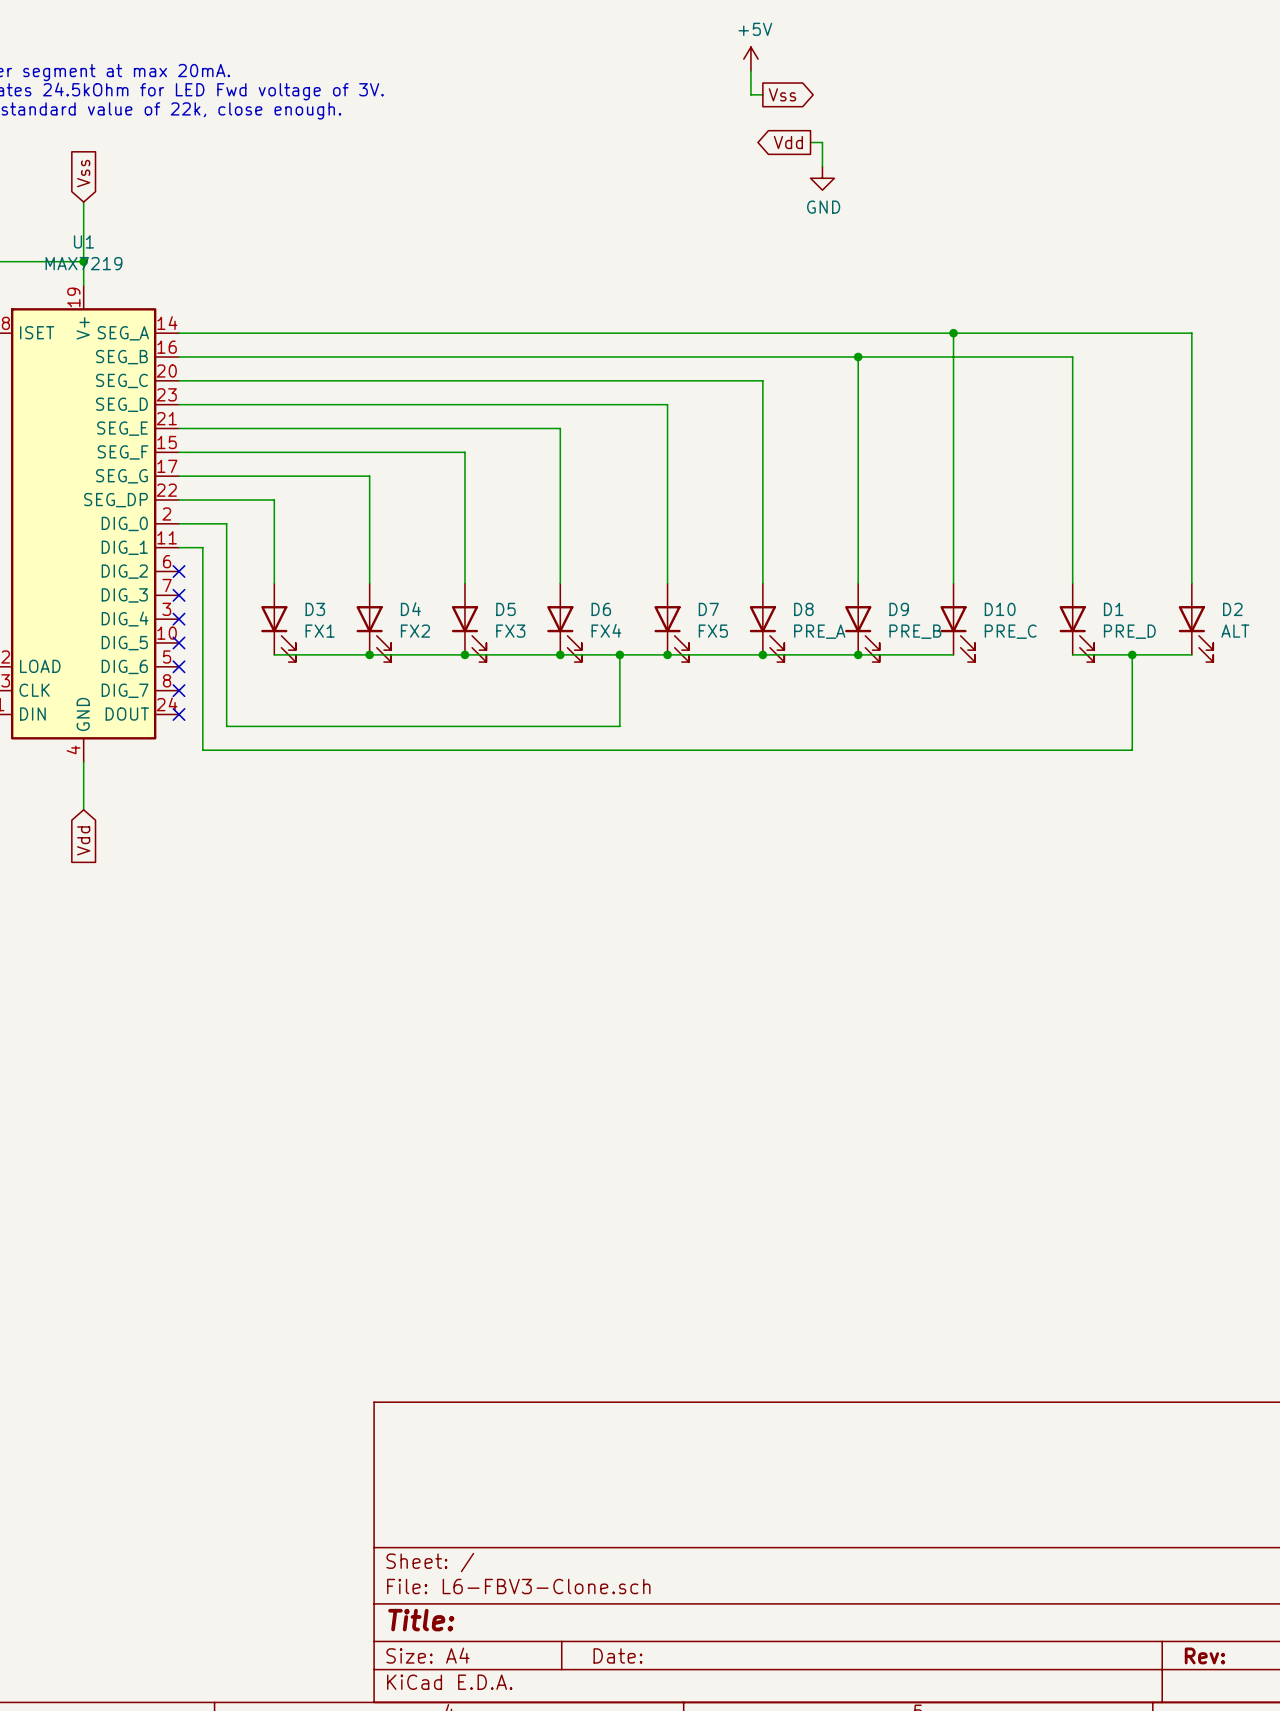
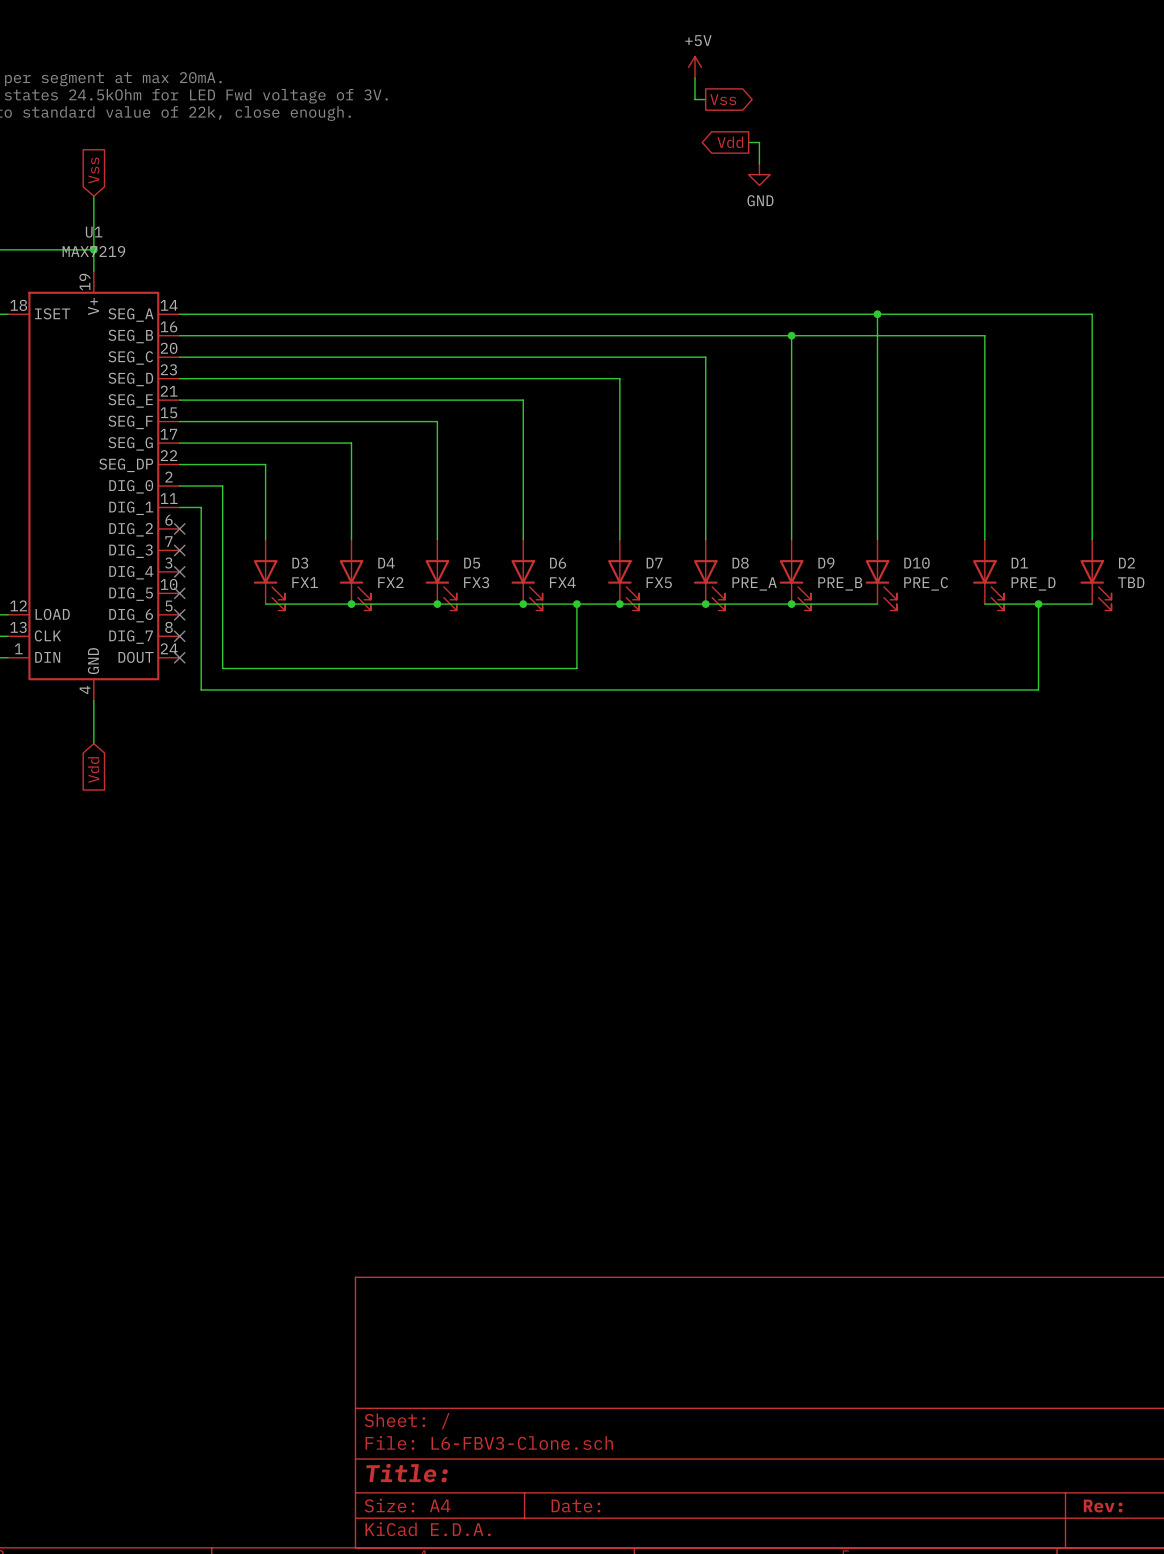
D2 value: ALT (1235, 631) -> TBD (1131, 582)

